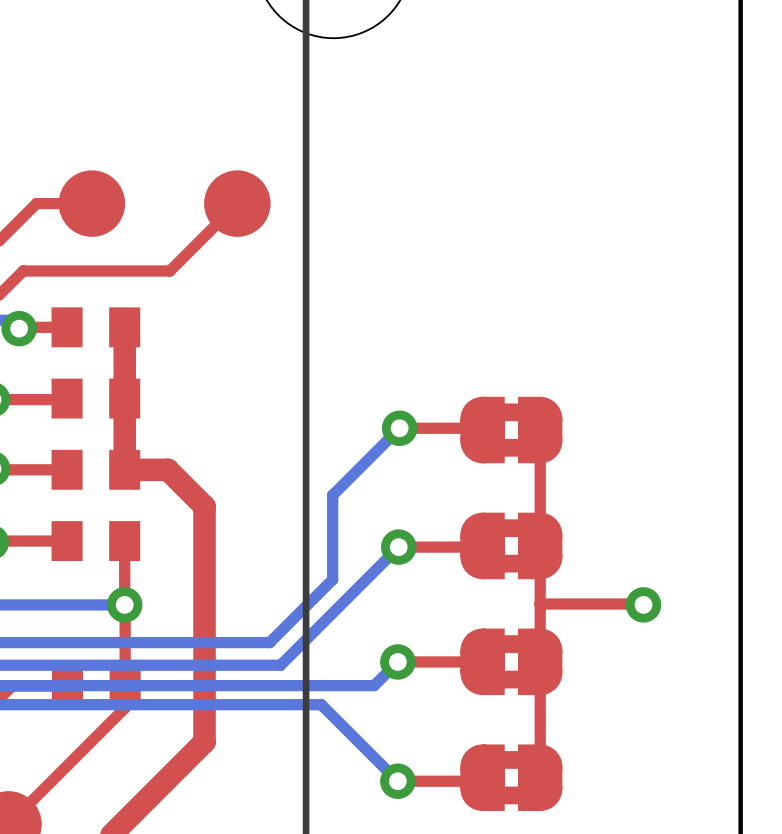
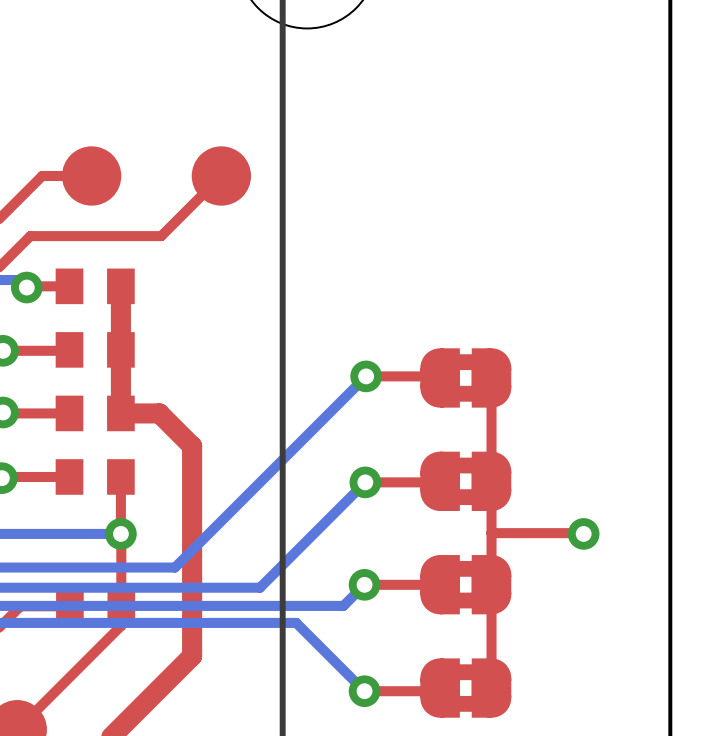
bottom track: (332, 495) (332, 579) (269, 642) (185, 642) -> (306, 436) (174, 567)

